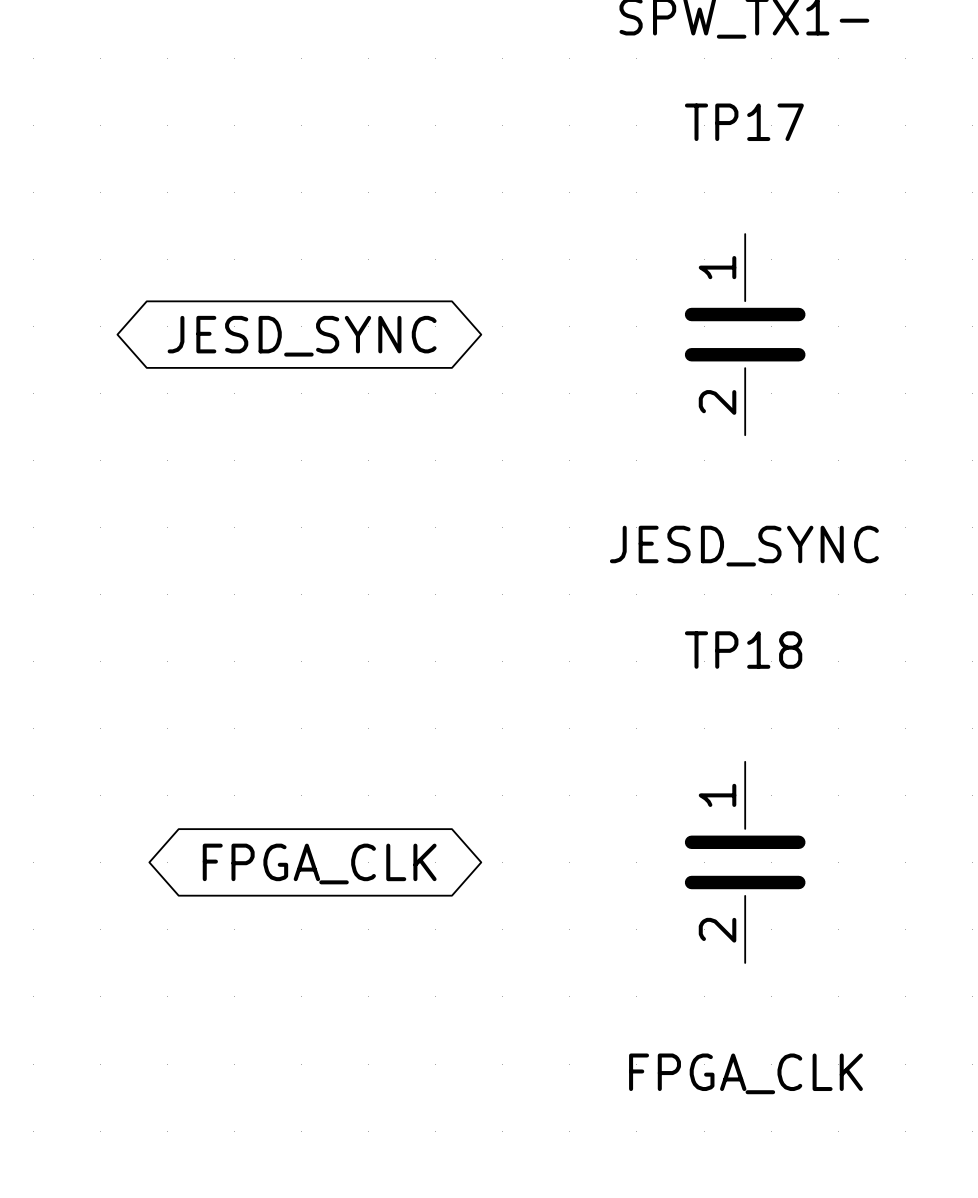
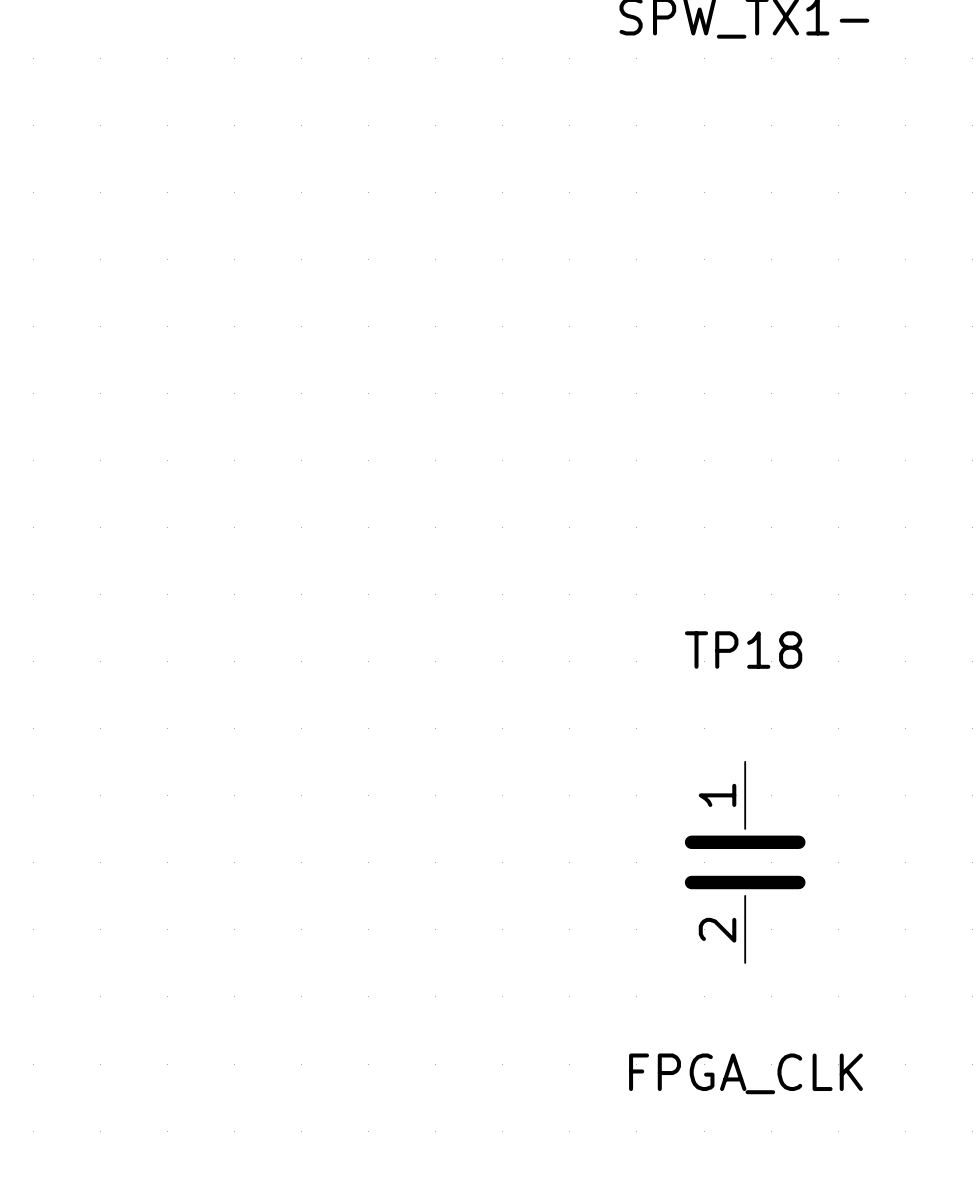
TP17: JESD_SYNC (745, 334) -> none
global label: JESD_SYNC (302, 336) -> none
global label: FPGA_CLK (319, 864) -> none

